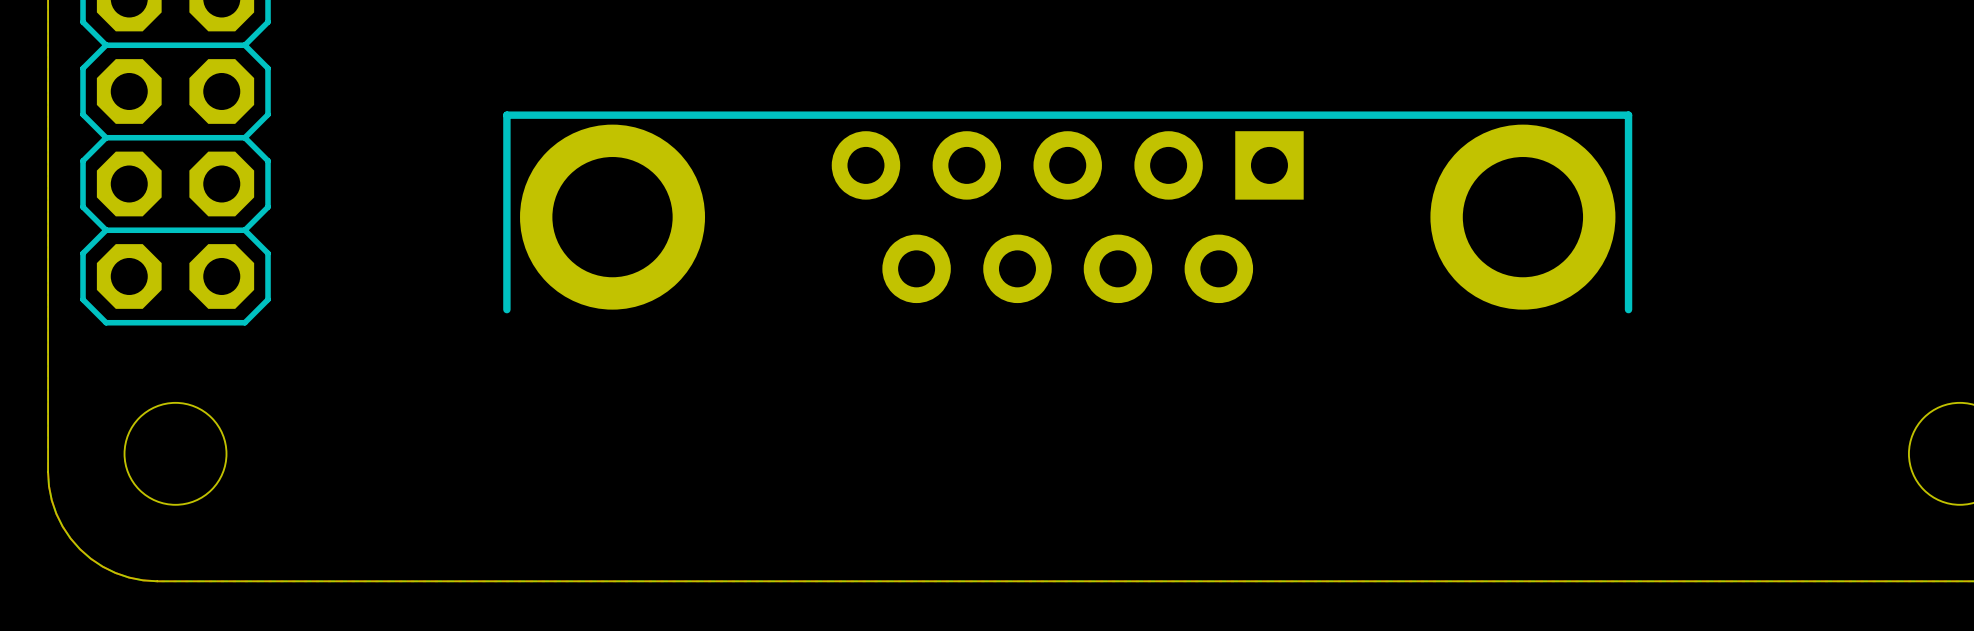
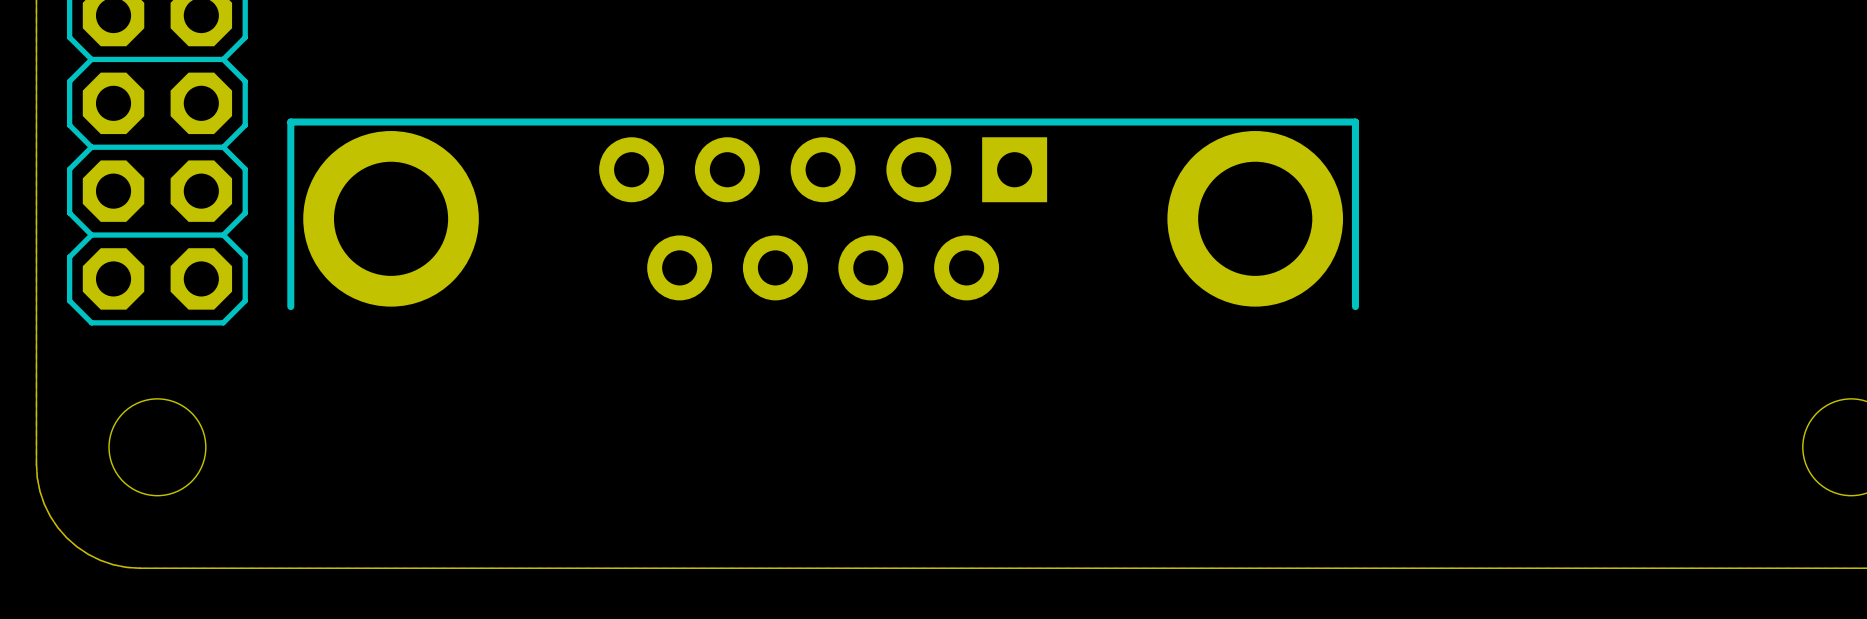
part position: (1067, 212) -> (823, 214)

